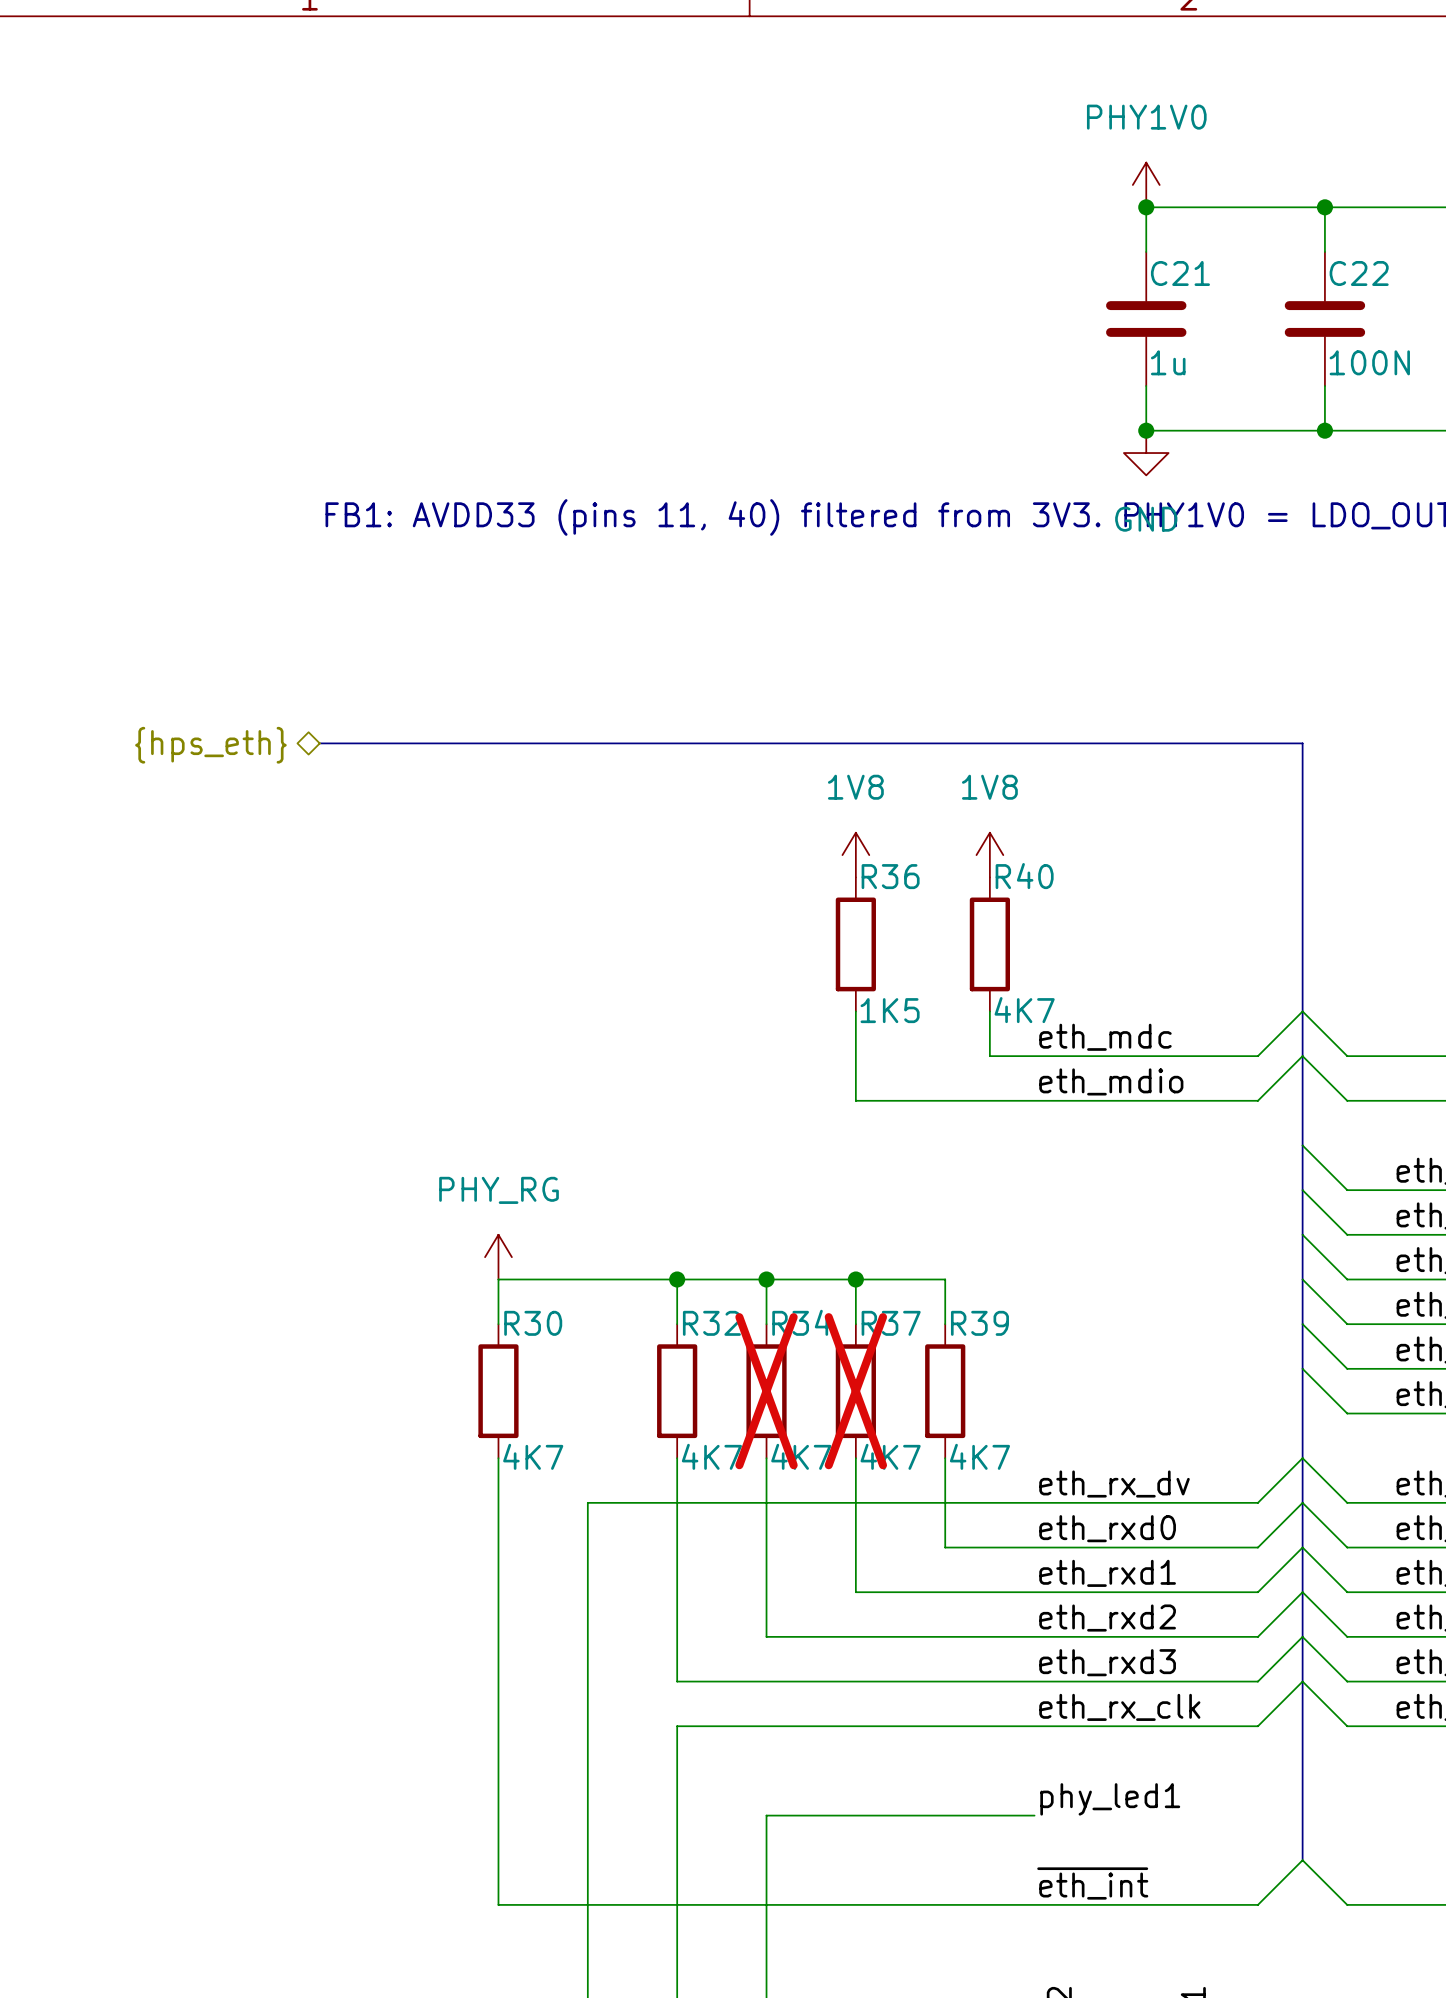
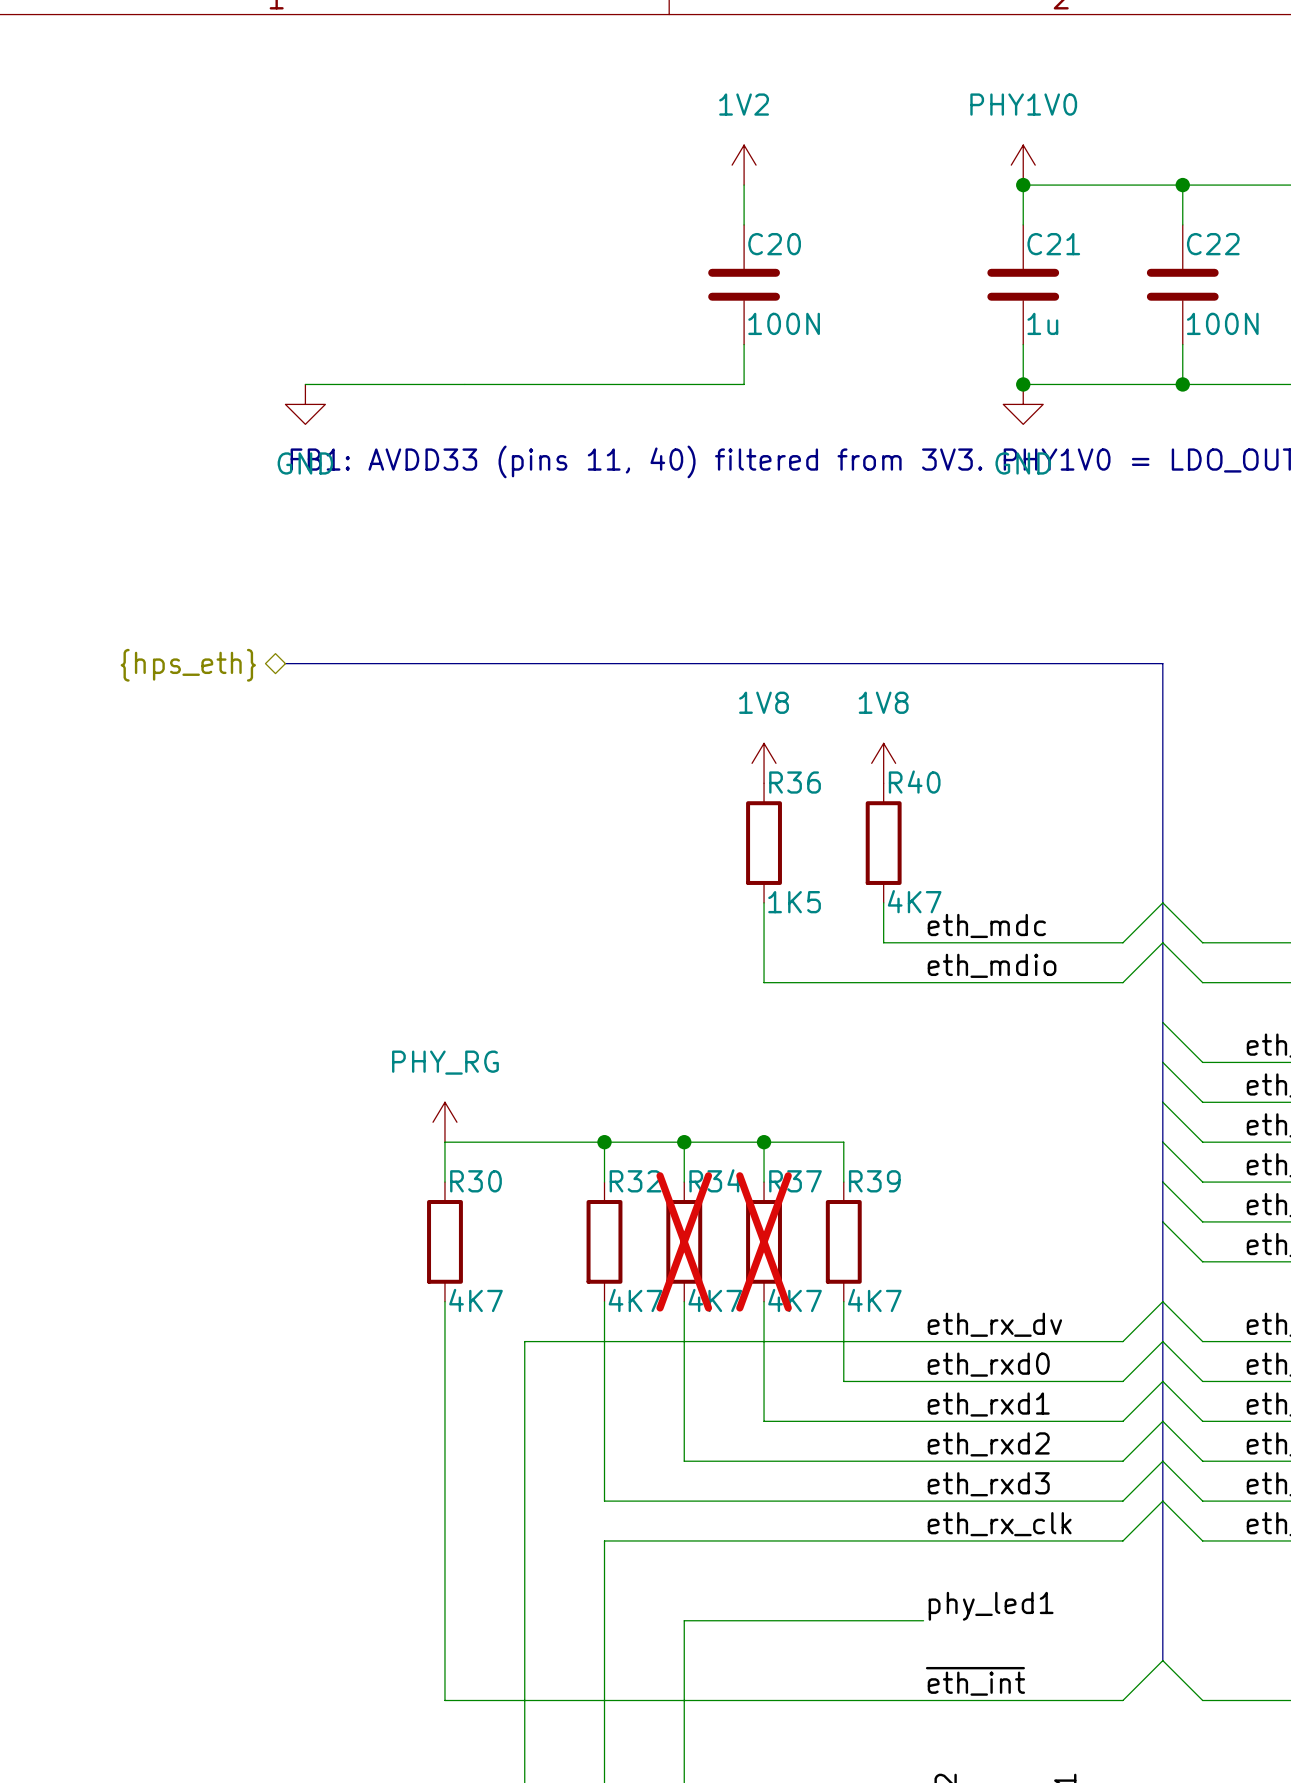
power symbol: none -> 1V2 (744, 165)
wire: none -> (744, 185) (744, 224)
C20: none -> 100N (744, 284)
wire: none -> (744, 344) (744, 384) (305, 384)
power symbol: none -> GND (305, 404)

